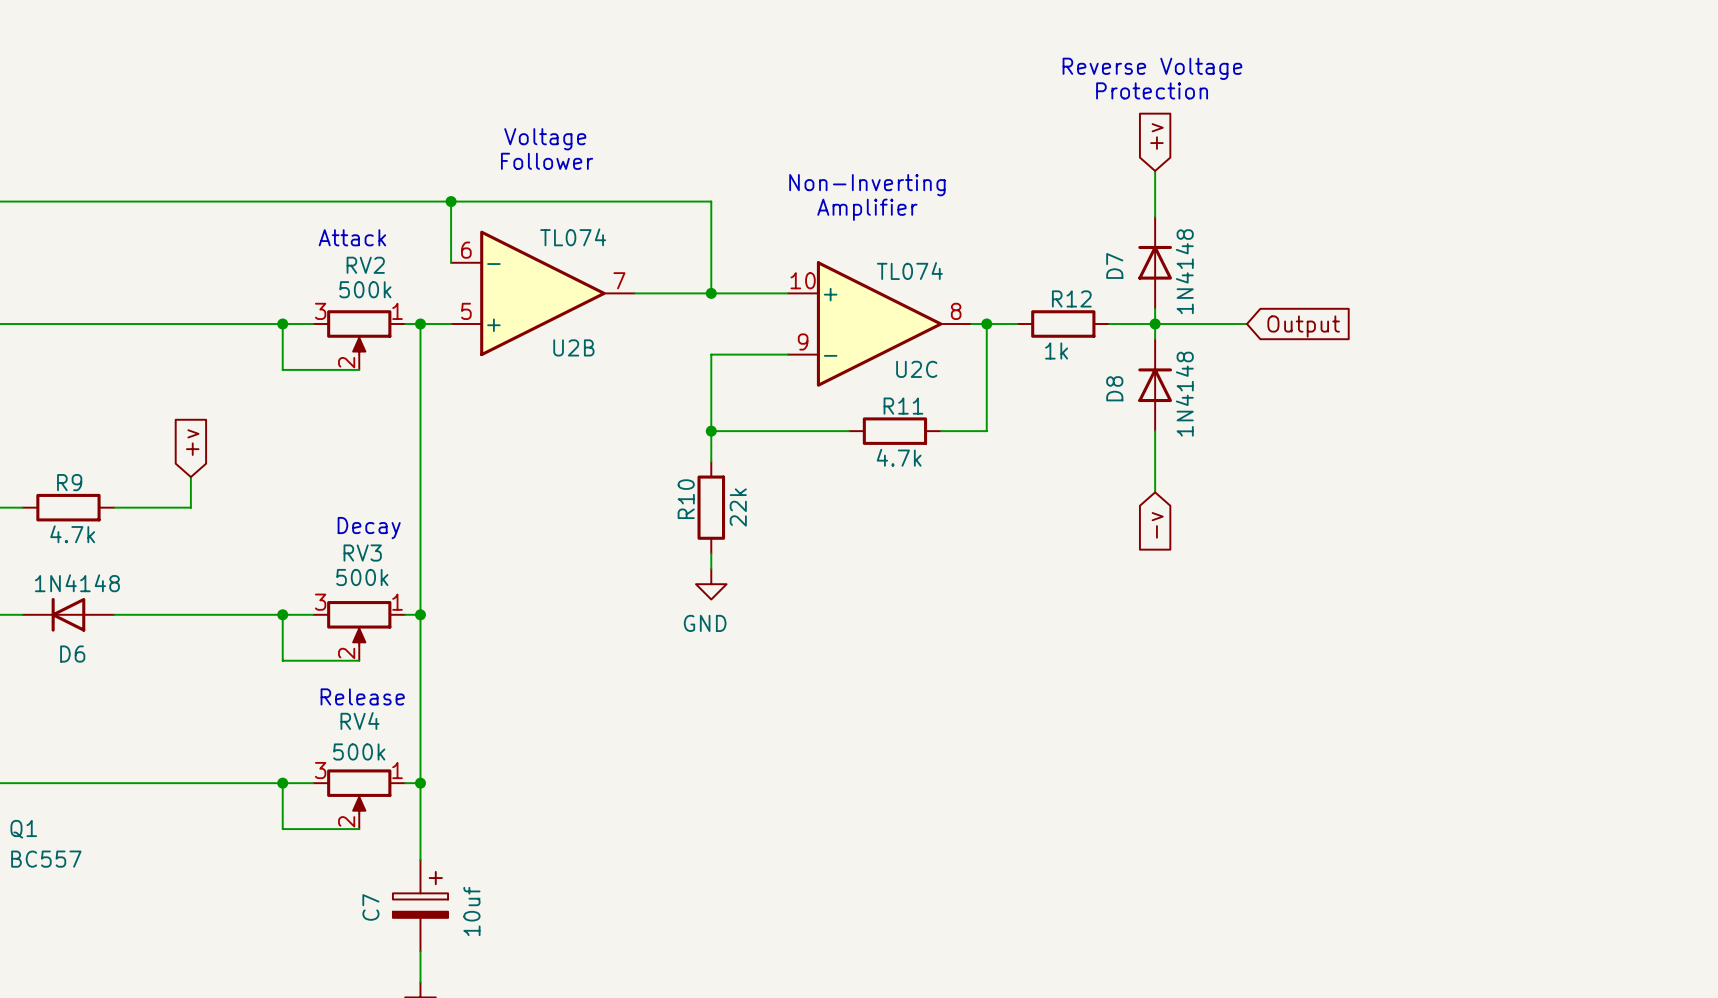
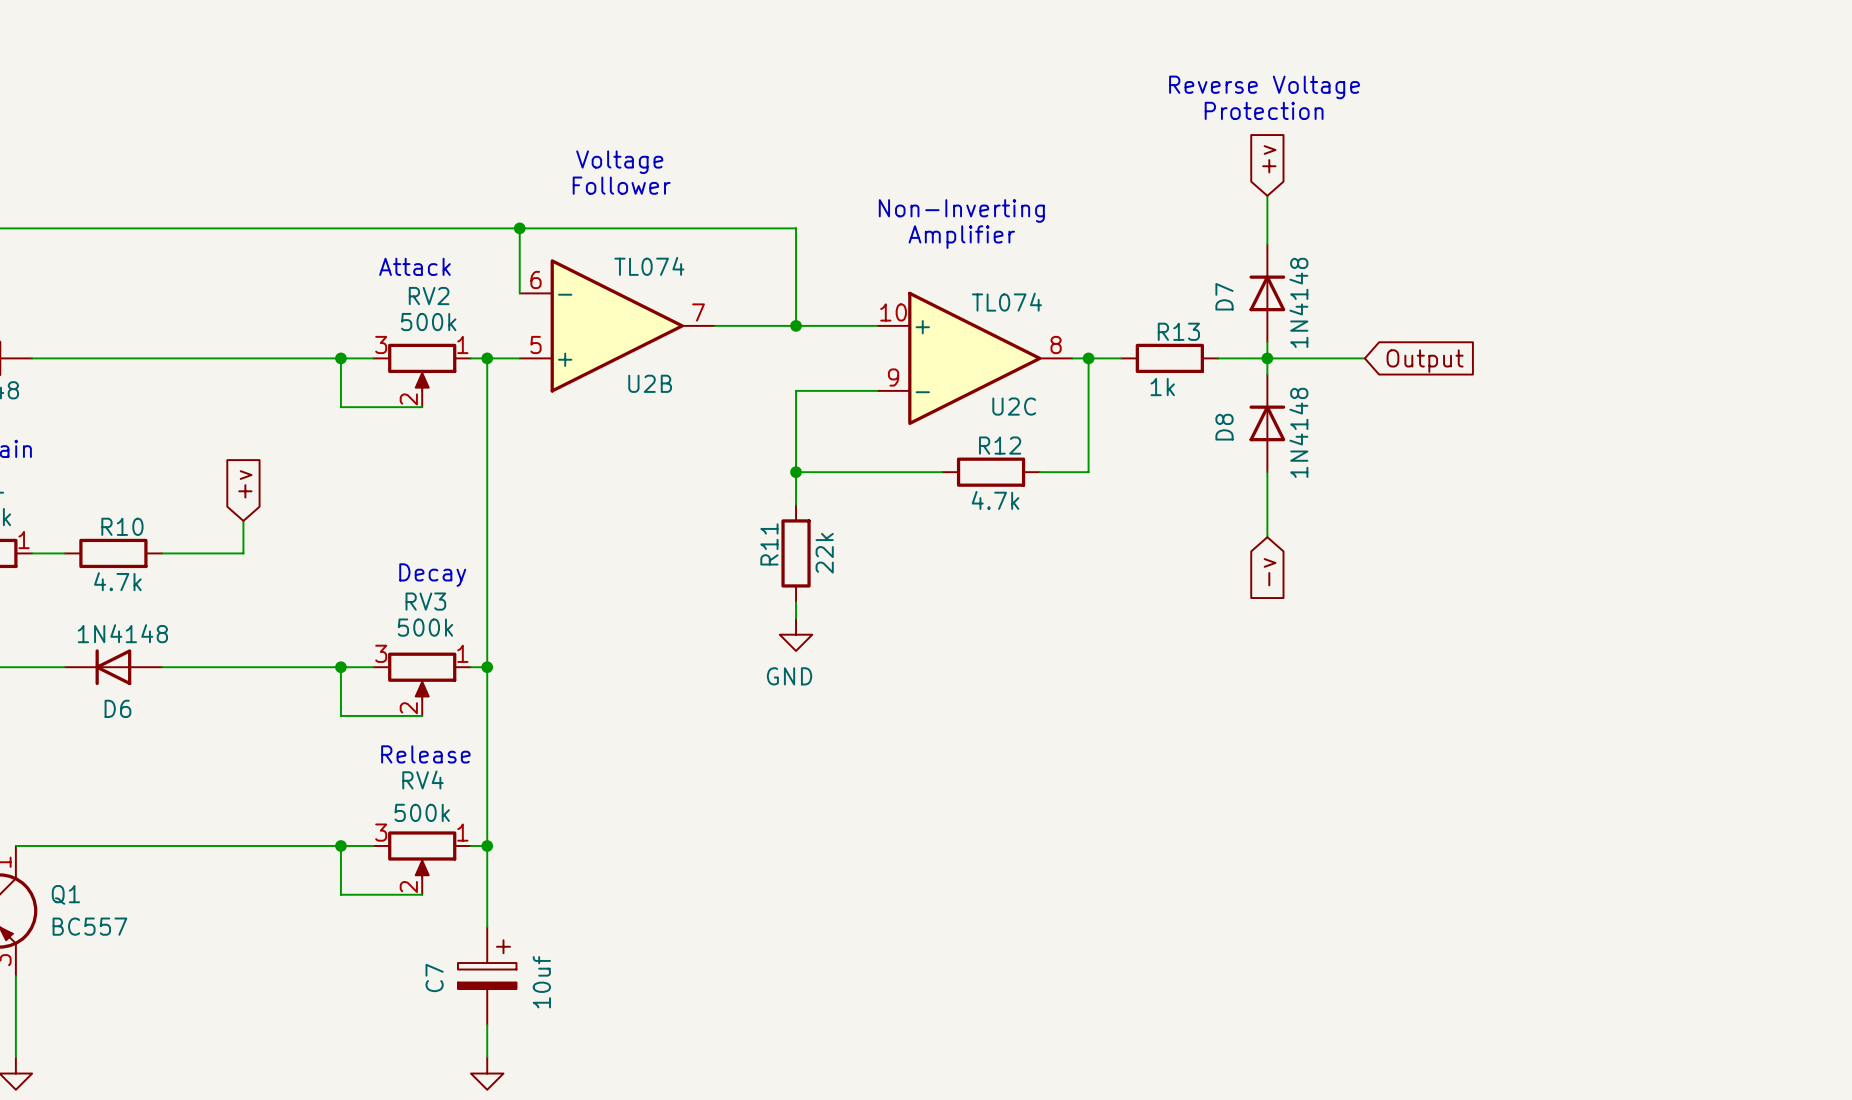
R12 name: R12 (1071, 298) -> R13 (1178, 331)
R11 name: R11 (903, 406) -> R12 (1000, 445)
R9 name: R9 (69, 482) -> R10 (122, 526)
R10 name: R10 (686, 499) -> R11 (769, 544)

